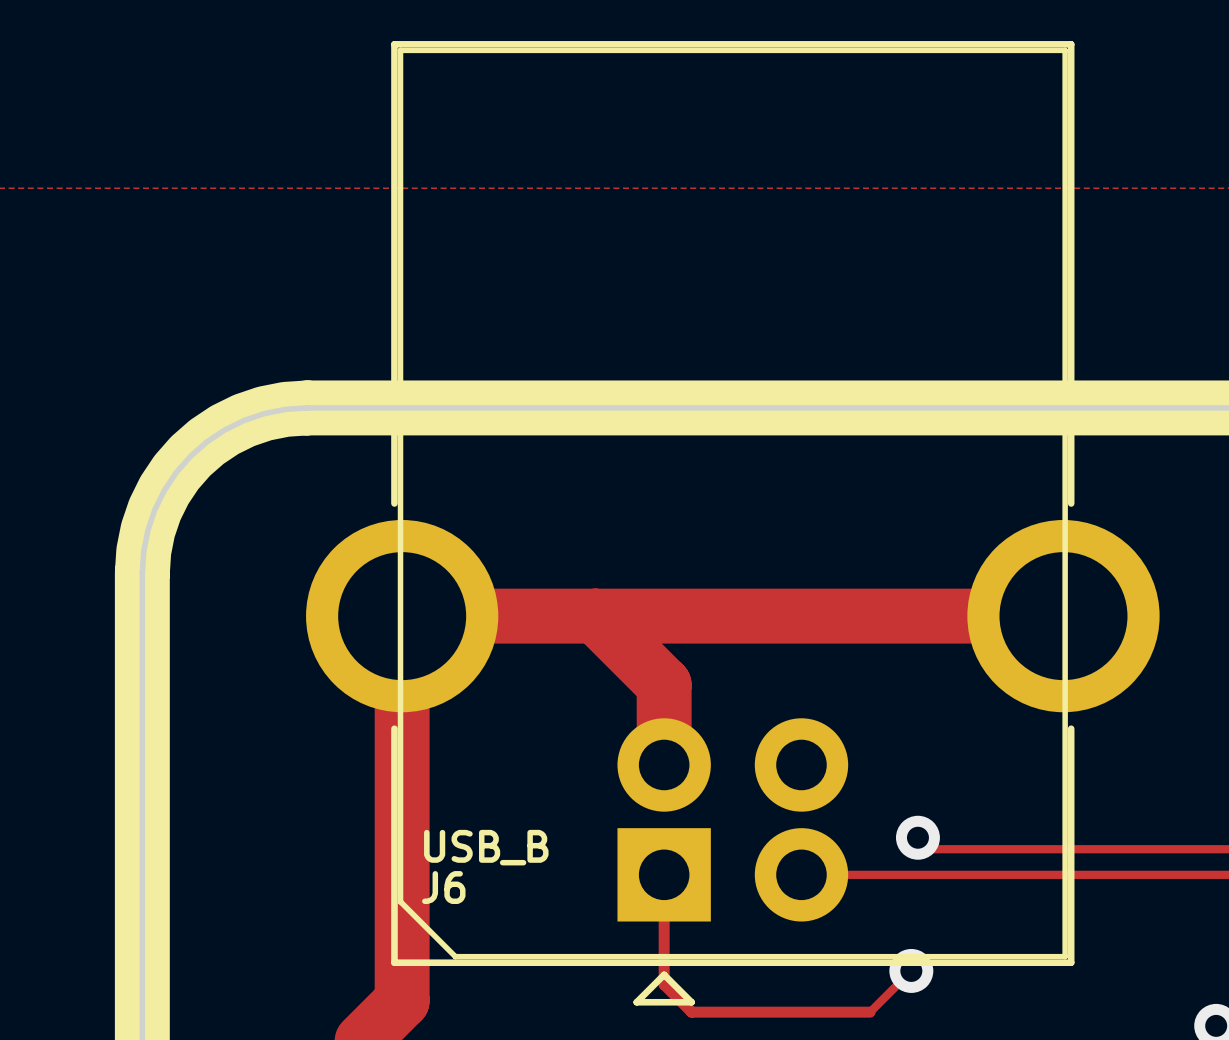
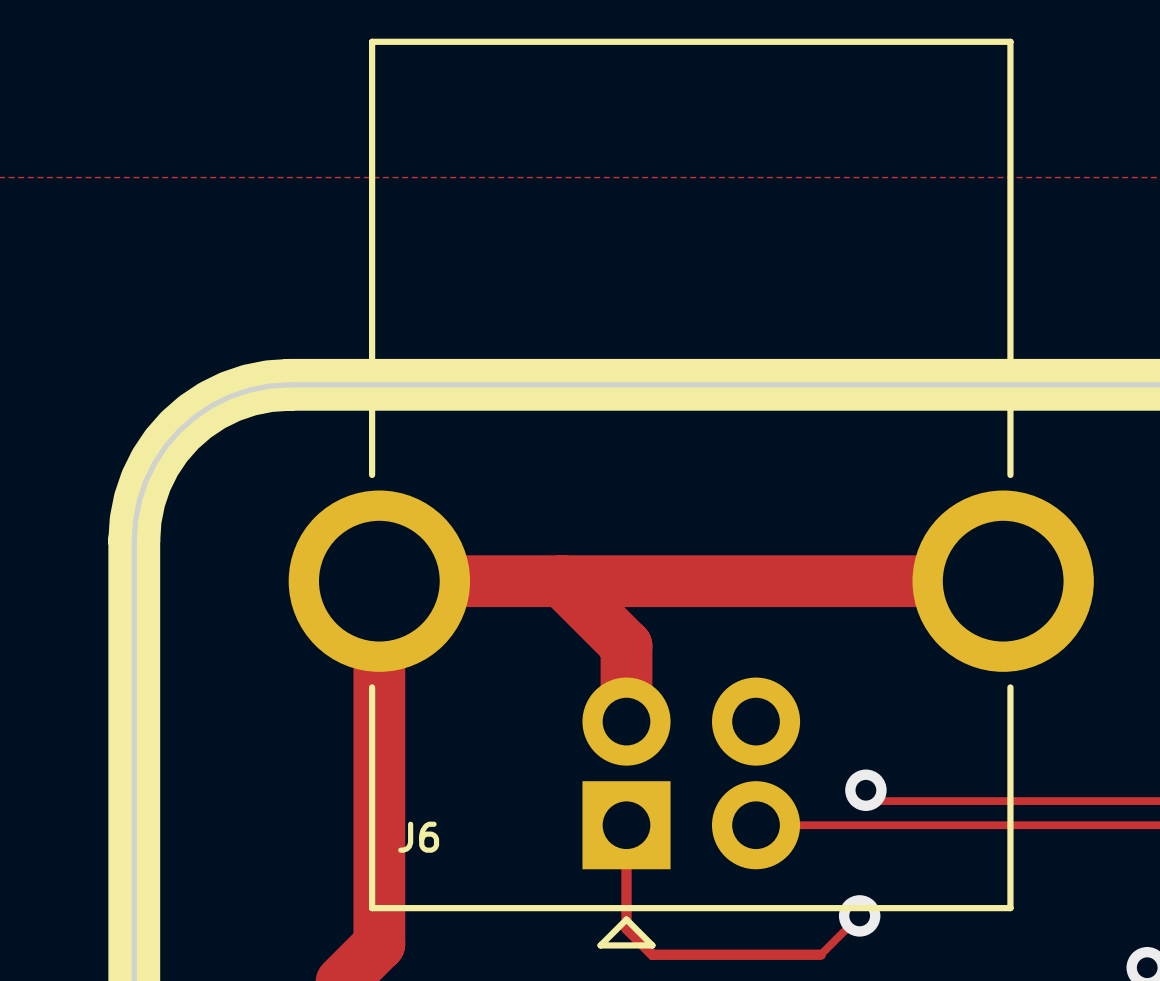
J6 footprint: [306, 41, 1160, 1006] -> [288, 38, 1094, 949]
J6 value: USB_B (486, 847) -> none

